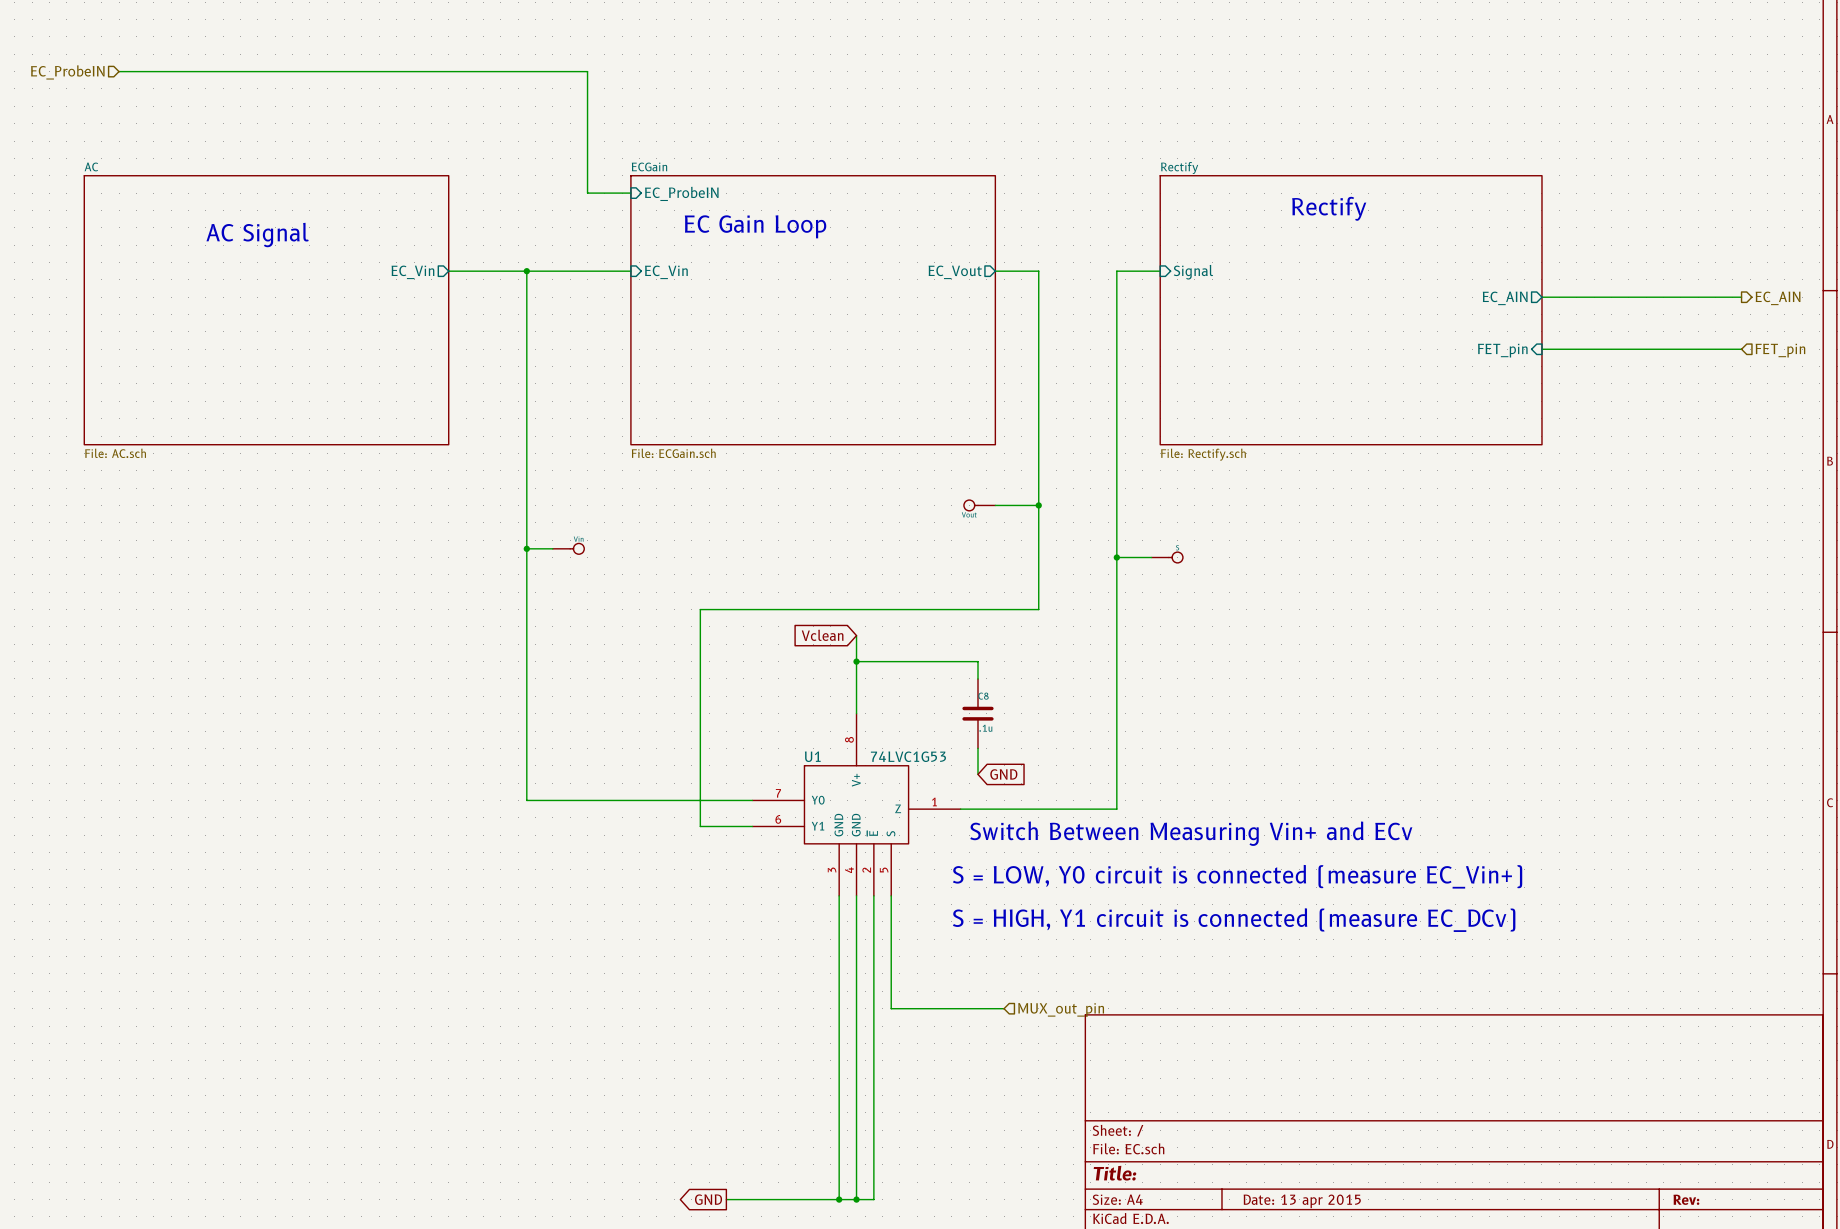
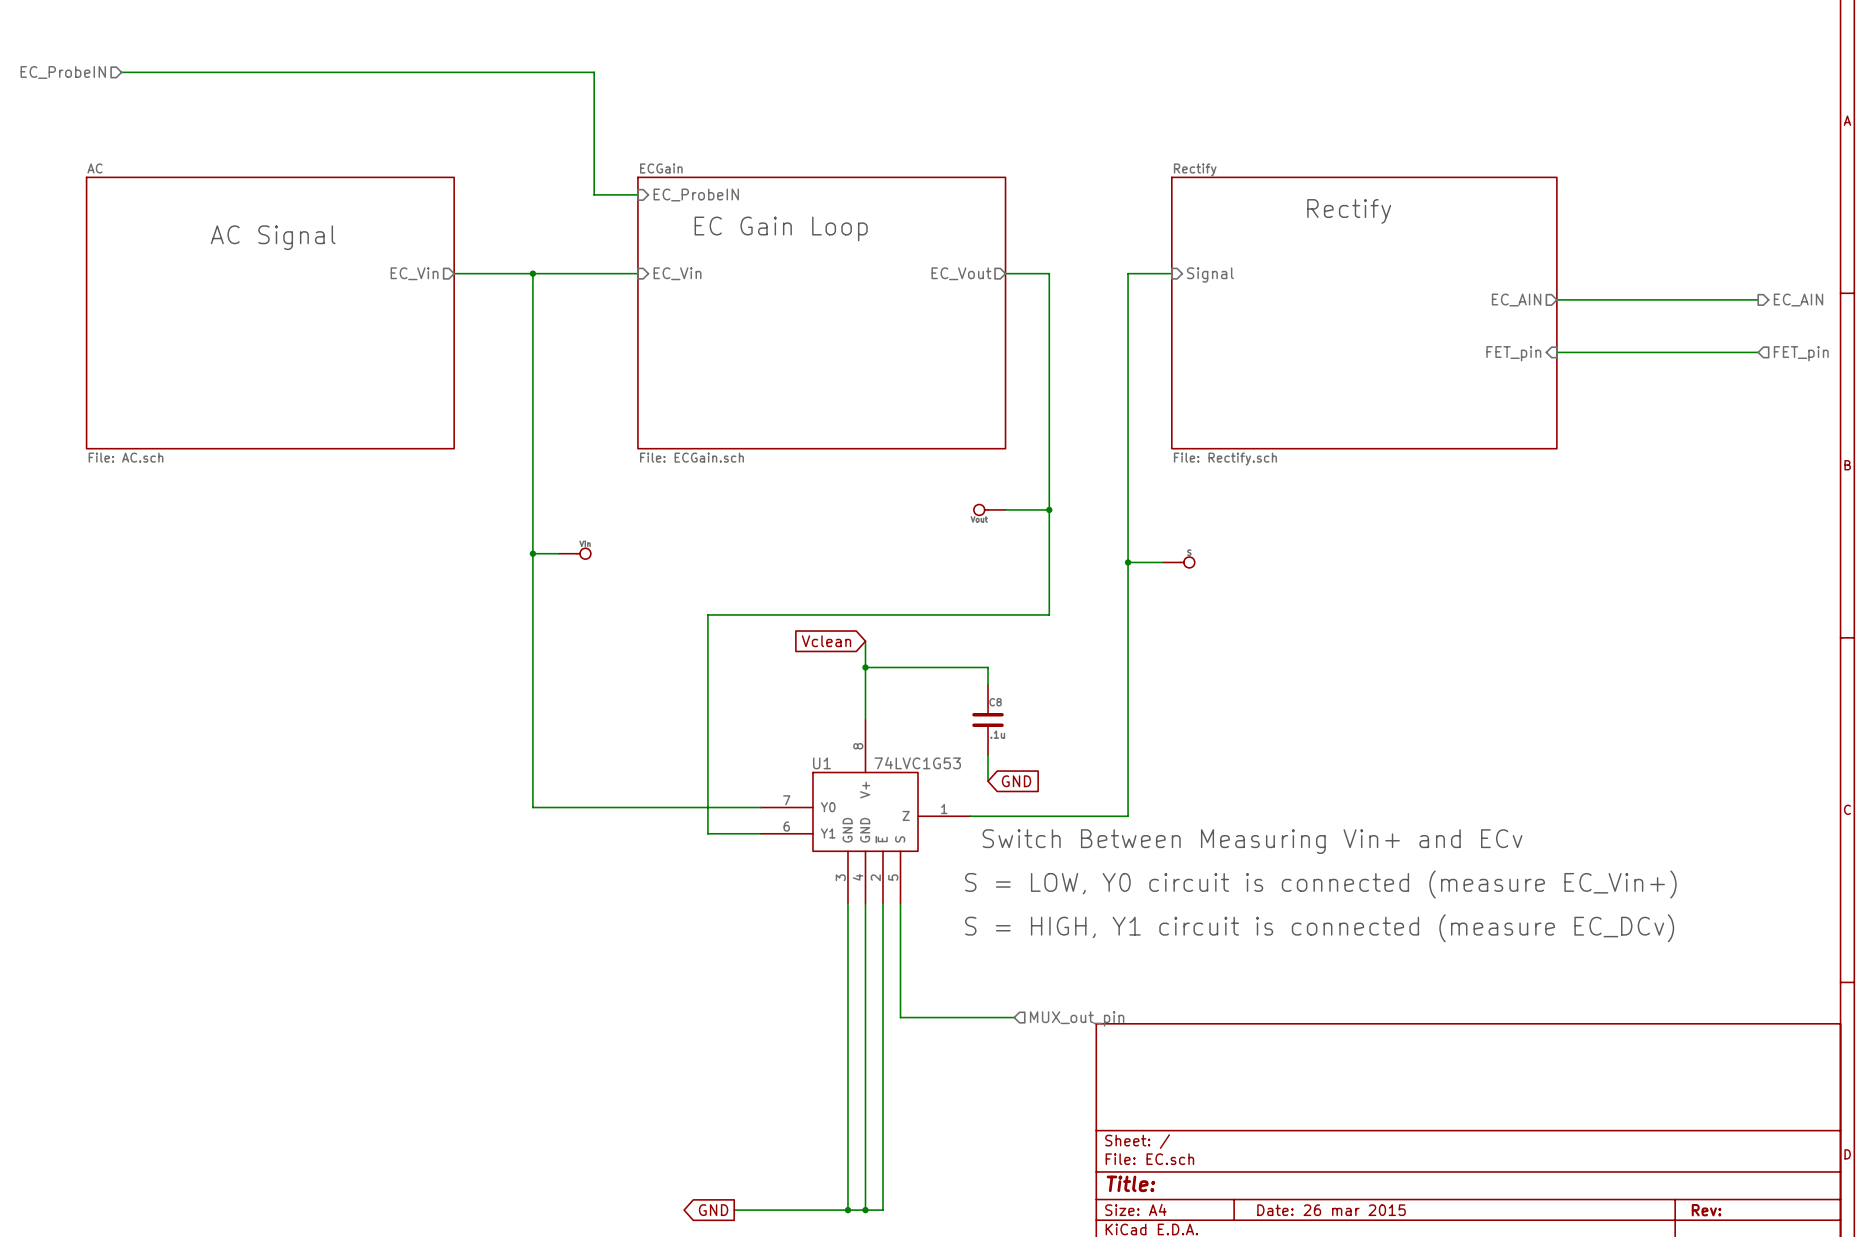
title block: Date: 13 apr 2015 (1302, 1201) -> Date: 26 mar 2015 (1331, 1210)

